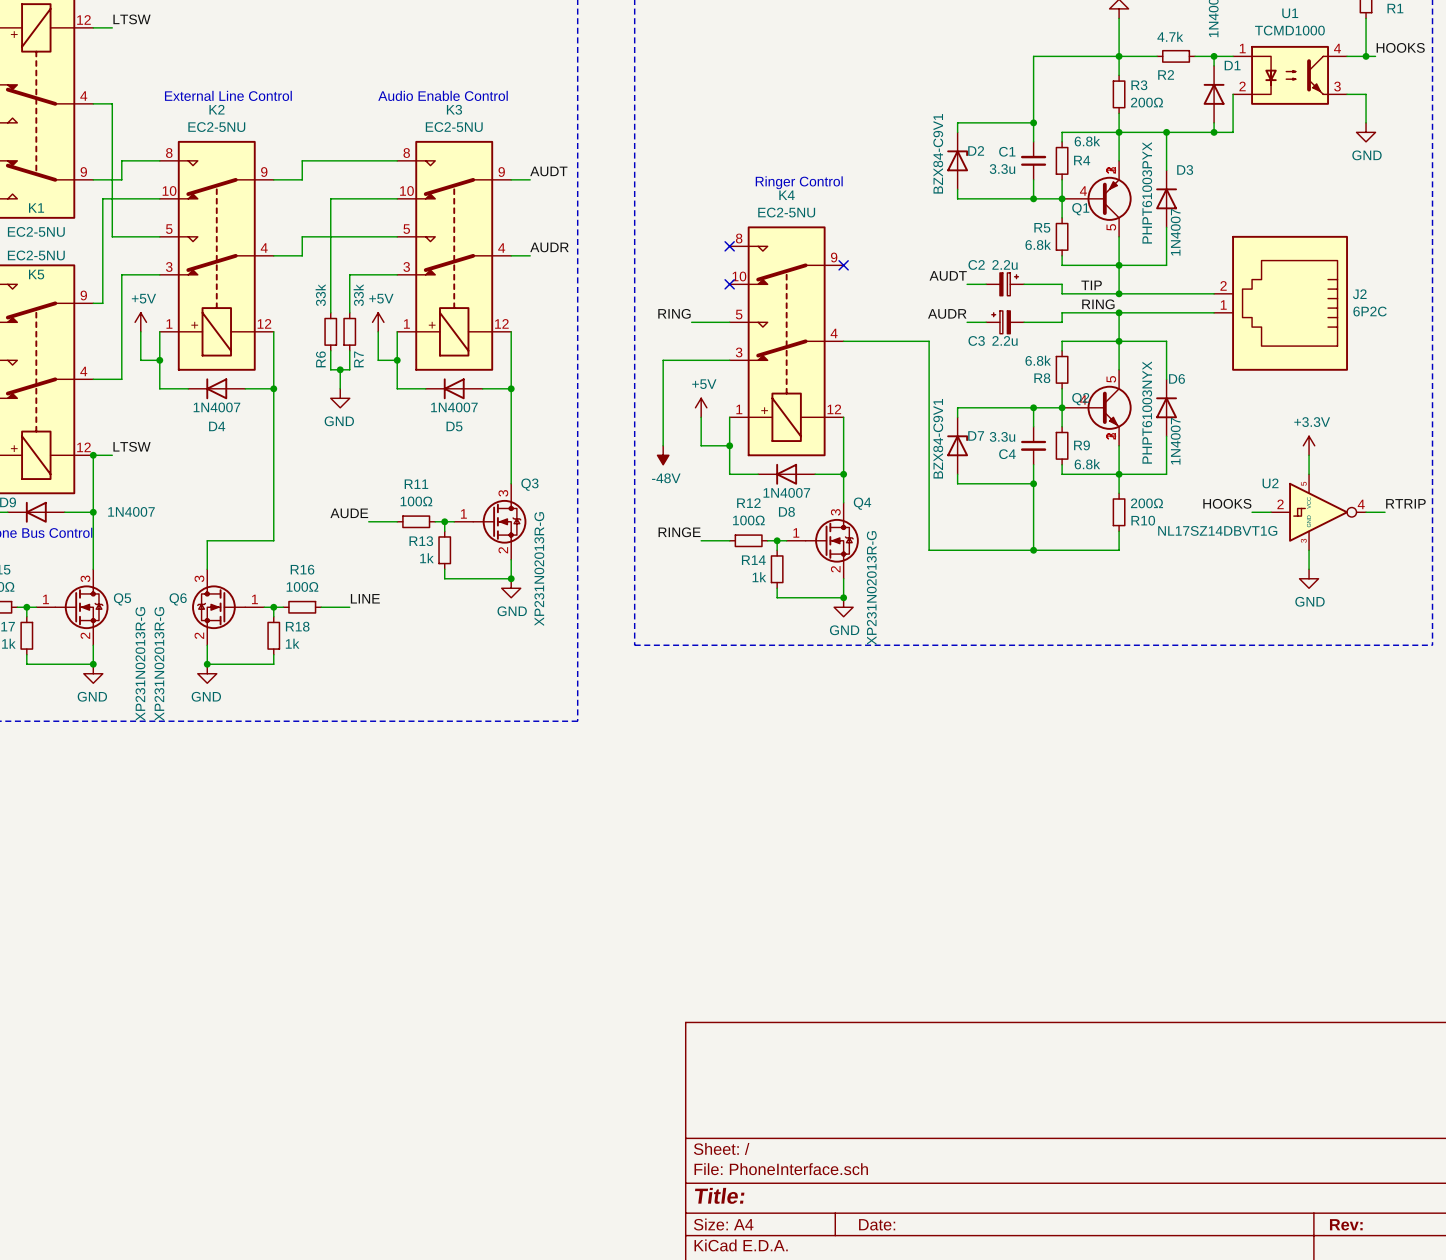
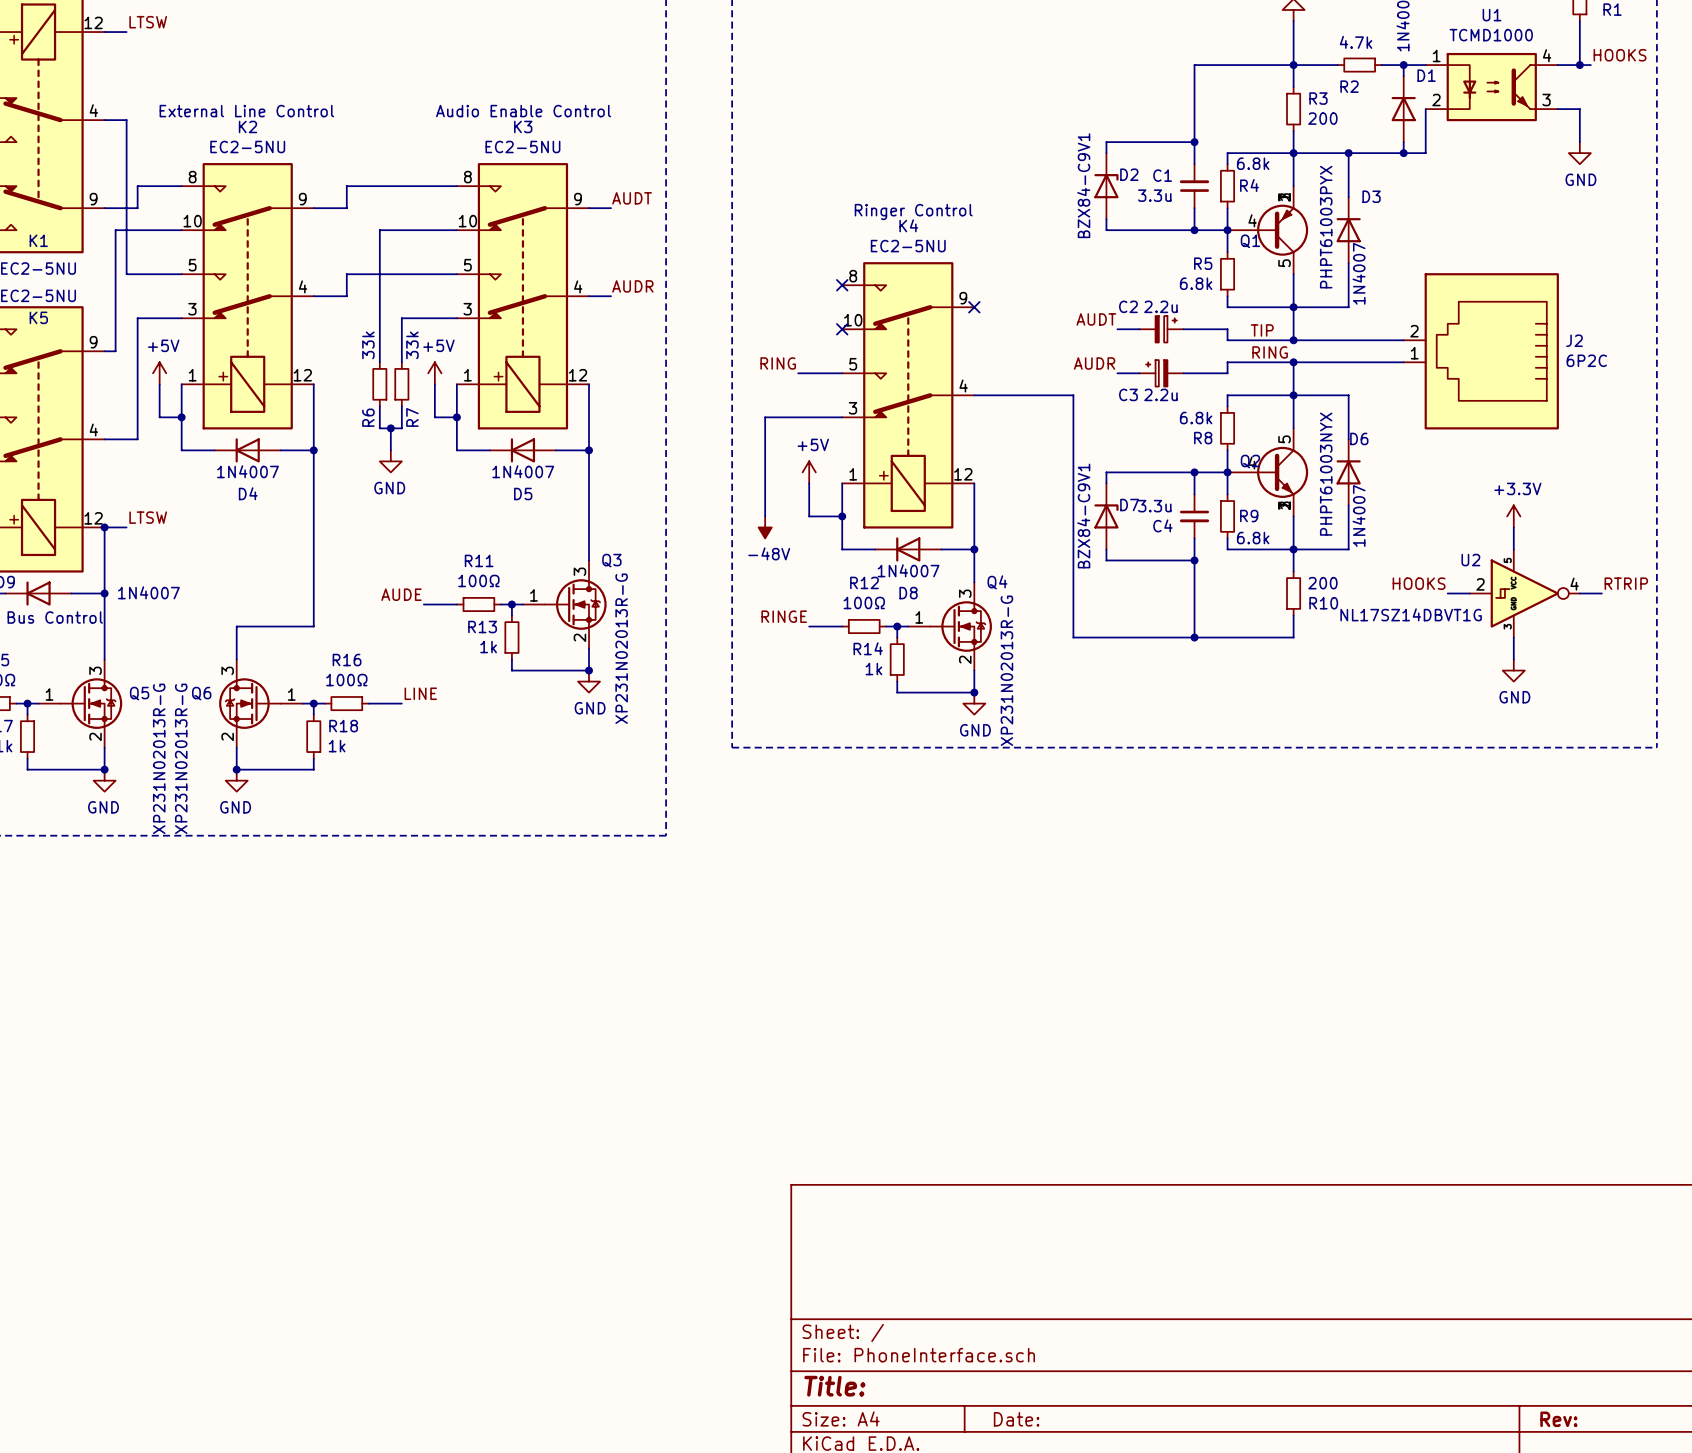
R3 value: 200Ω (1147, 102) -> 200 (1322, 118)
R10 value: 200Ω (1147, 503) -> 200 (1322, 583)

